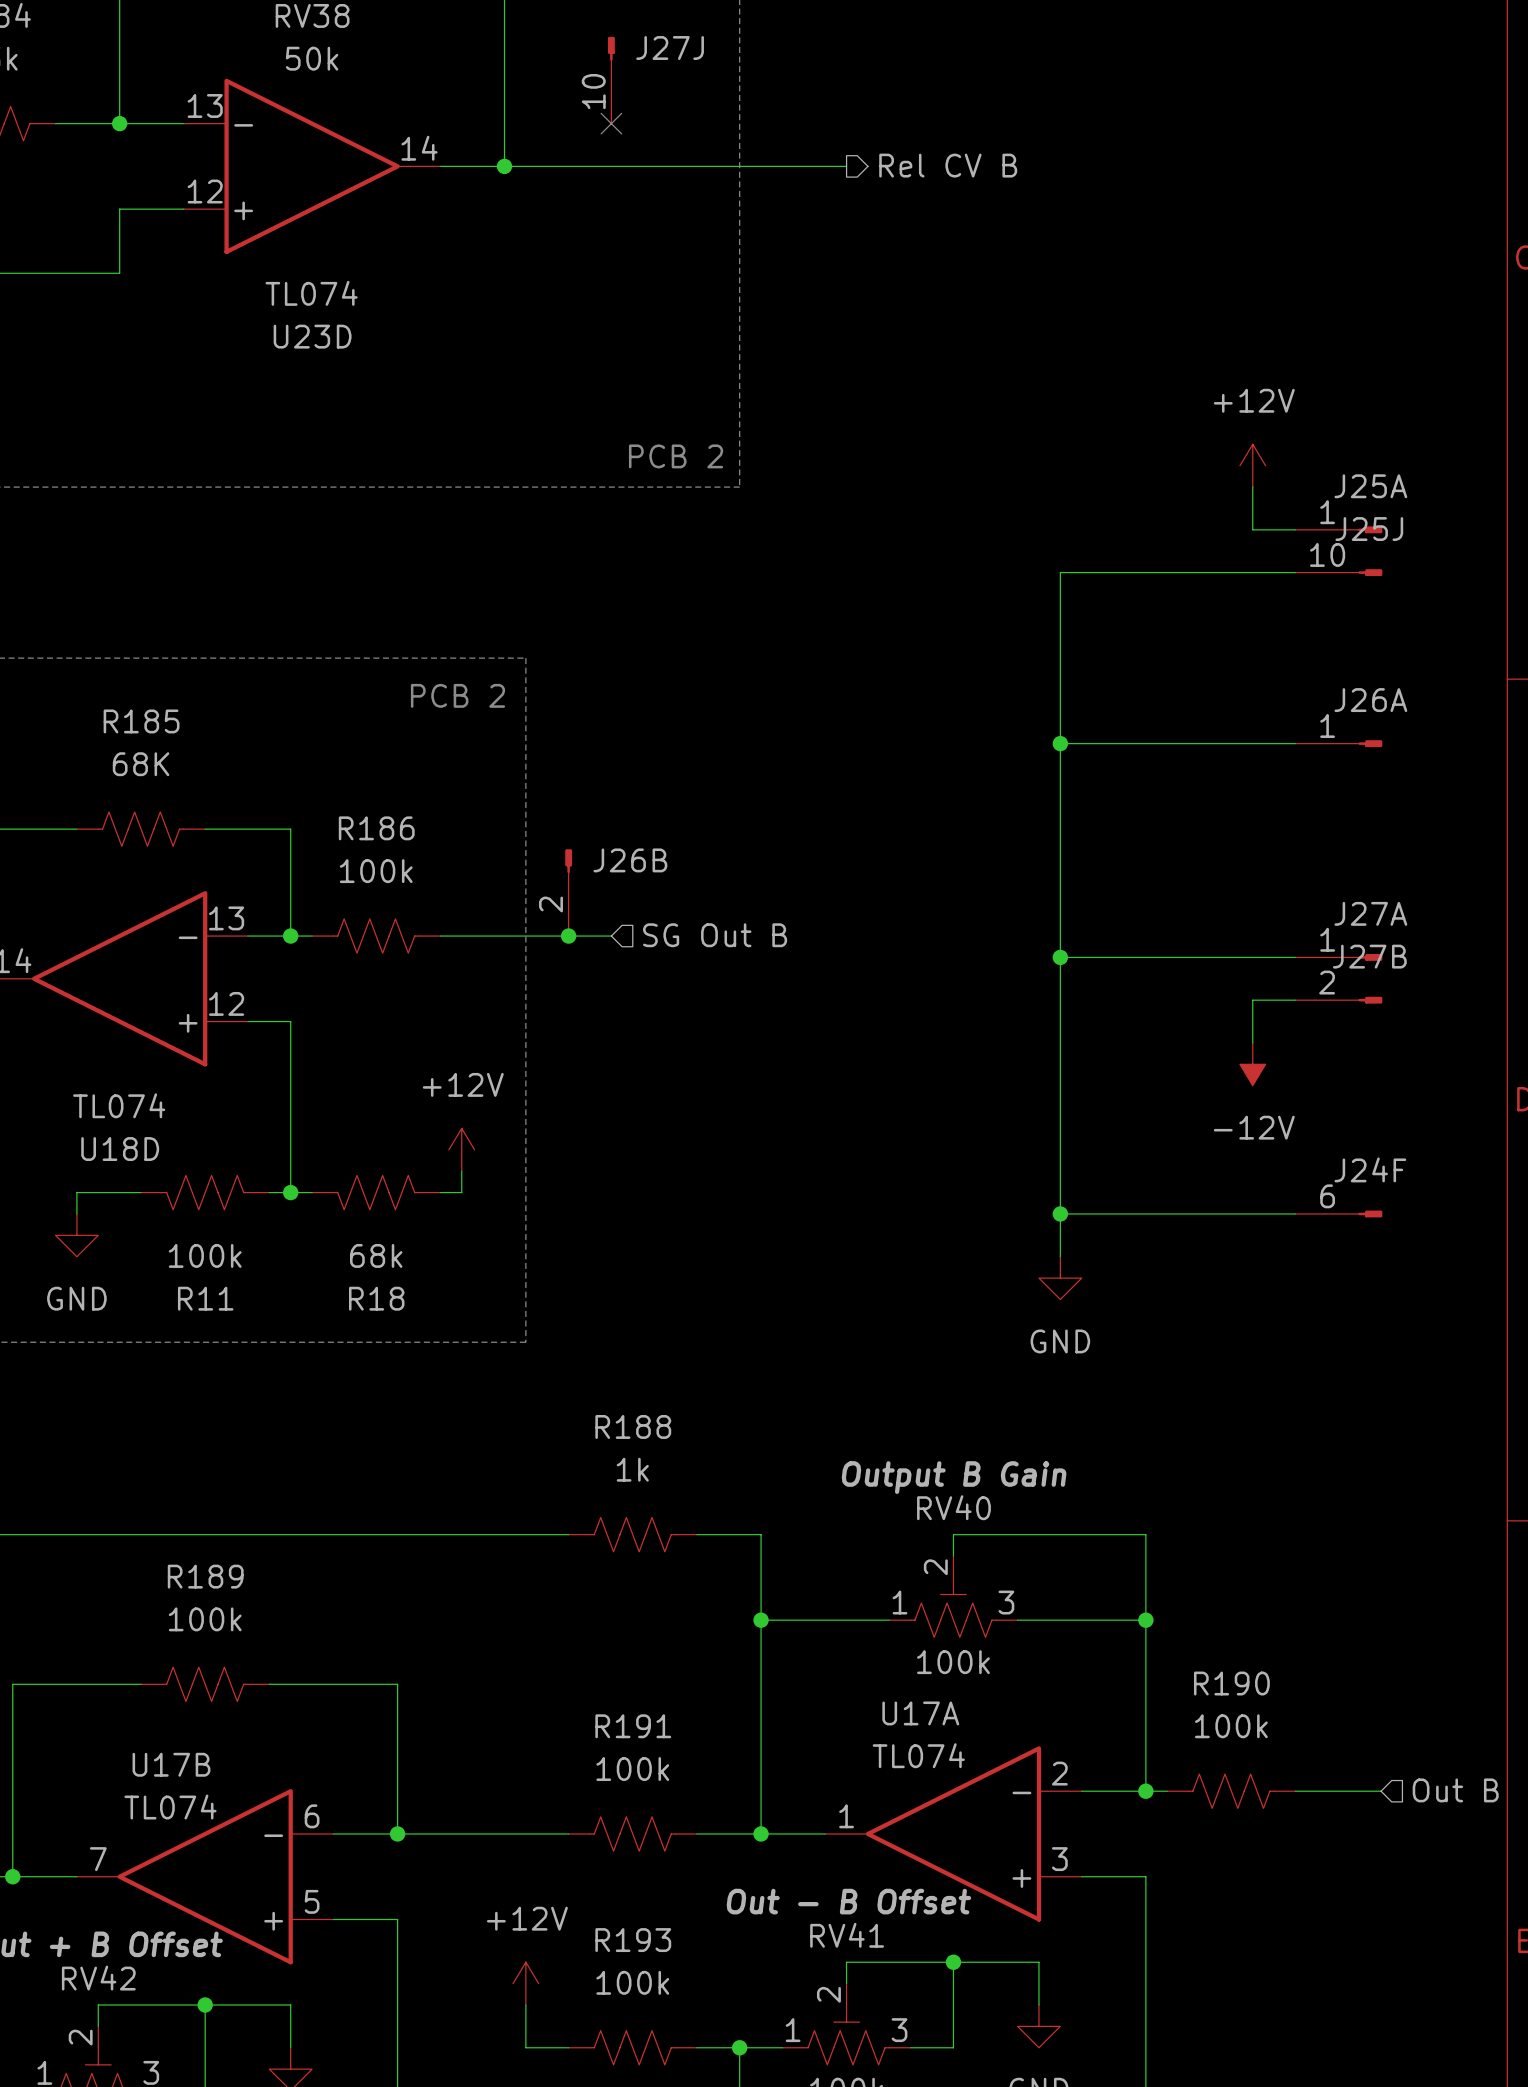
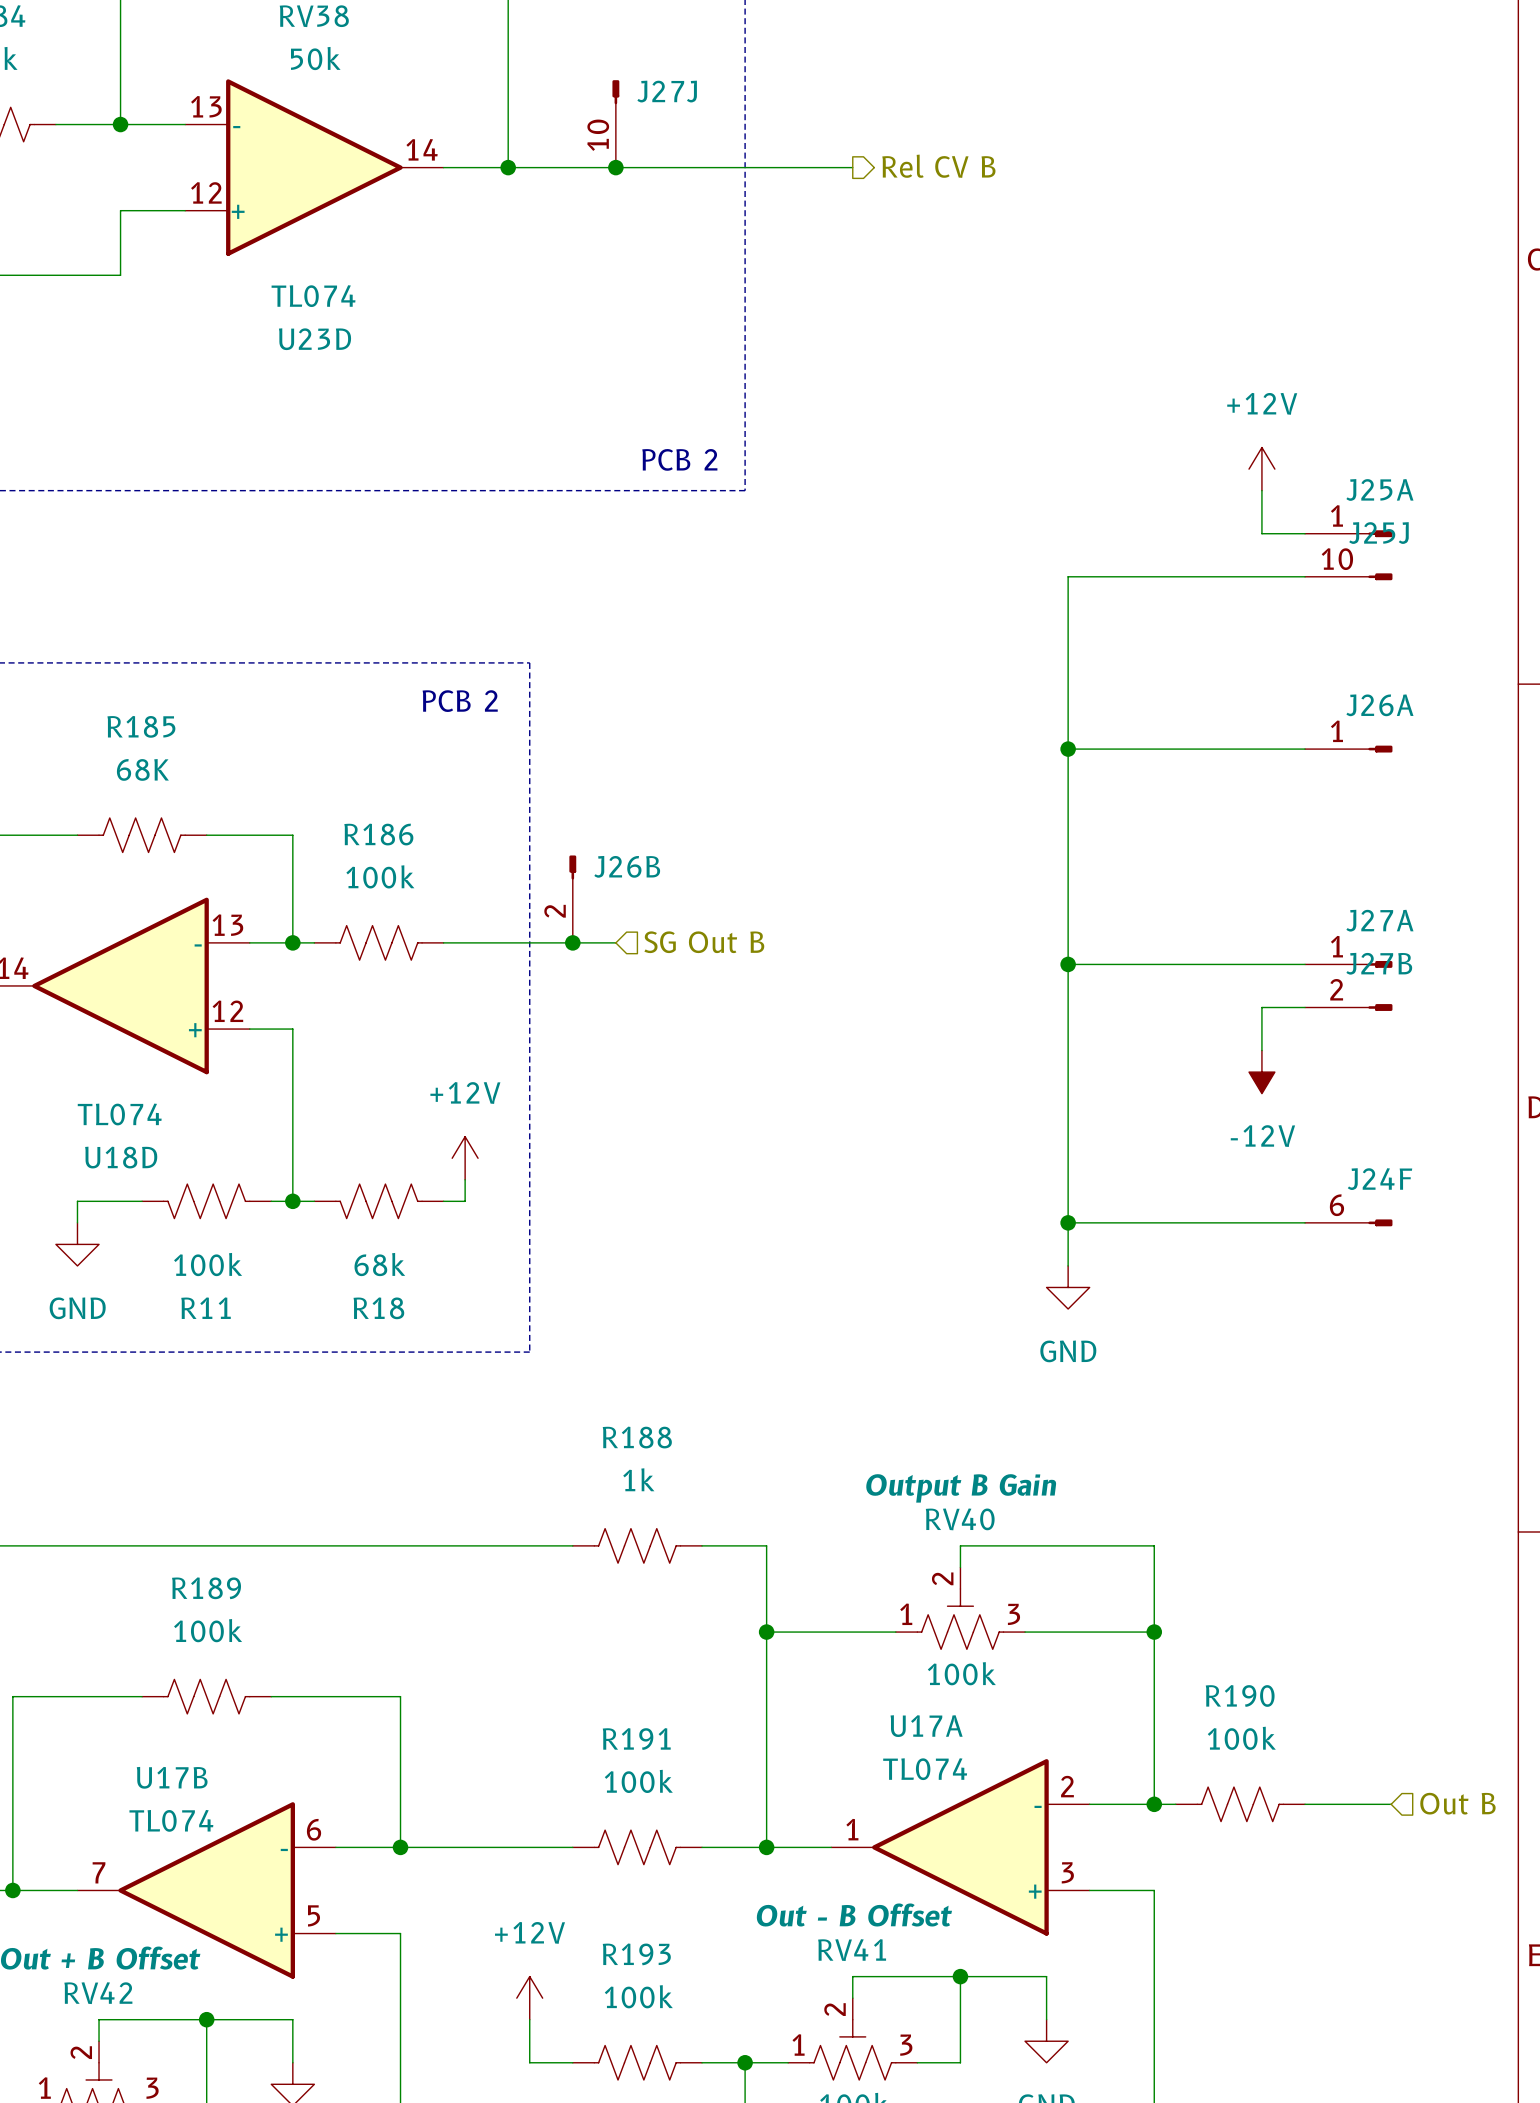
J27J position: (611, 80) -> (615, 123)
no-connect mark: (611, 123) -> none
junction: none -> (615, 167)

